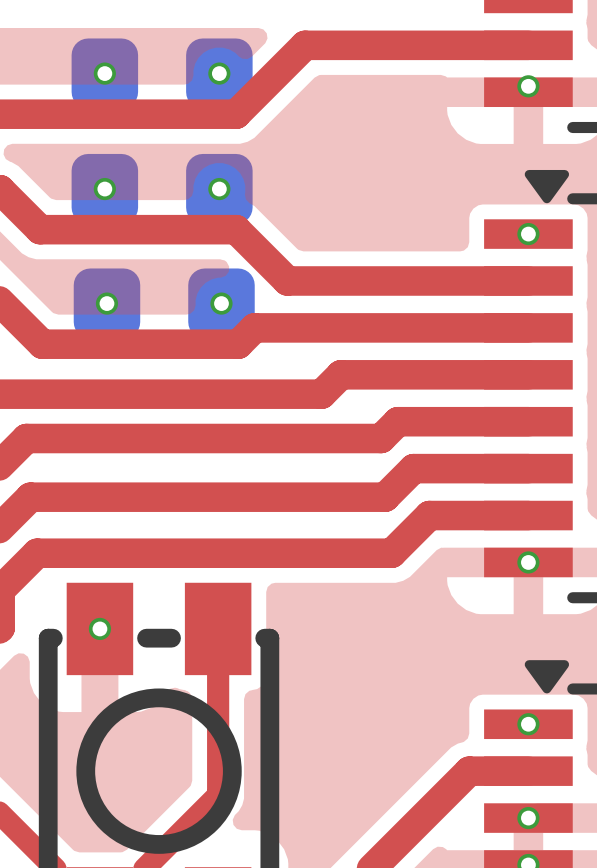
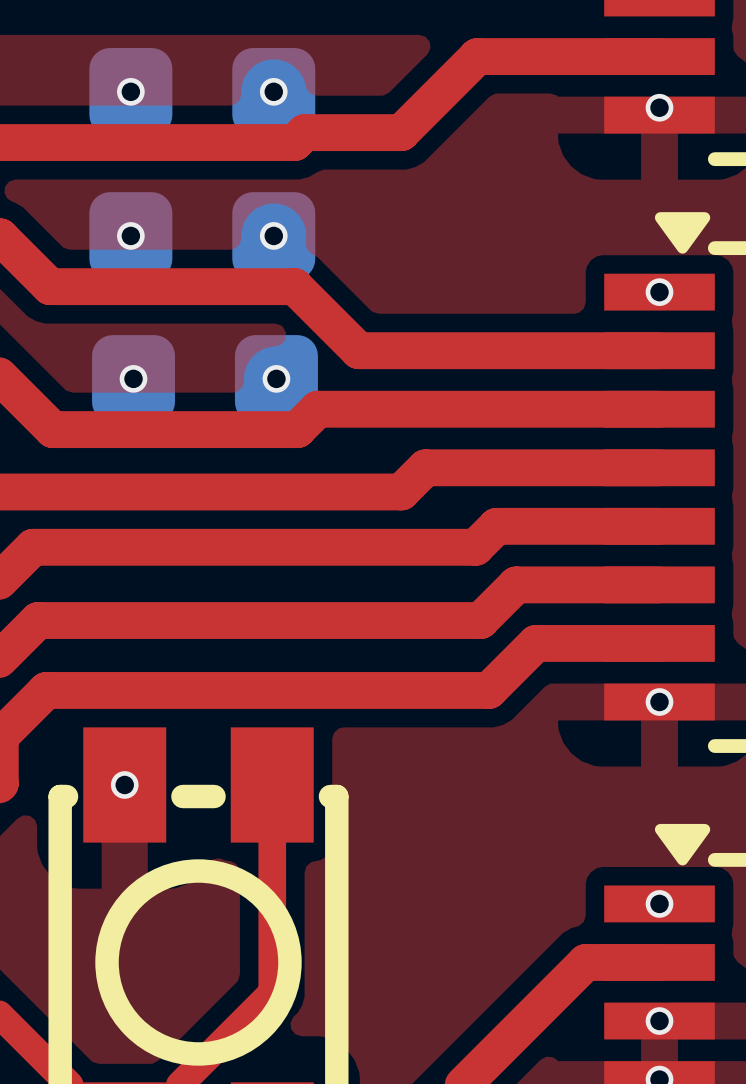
top track: (382, 45) (305, 45) (244, 106) -> (477, 56) (401, 132) (304, 132)

